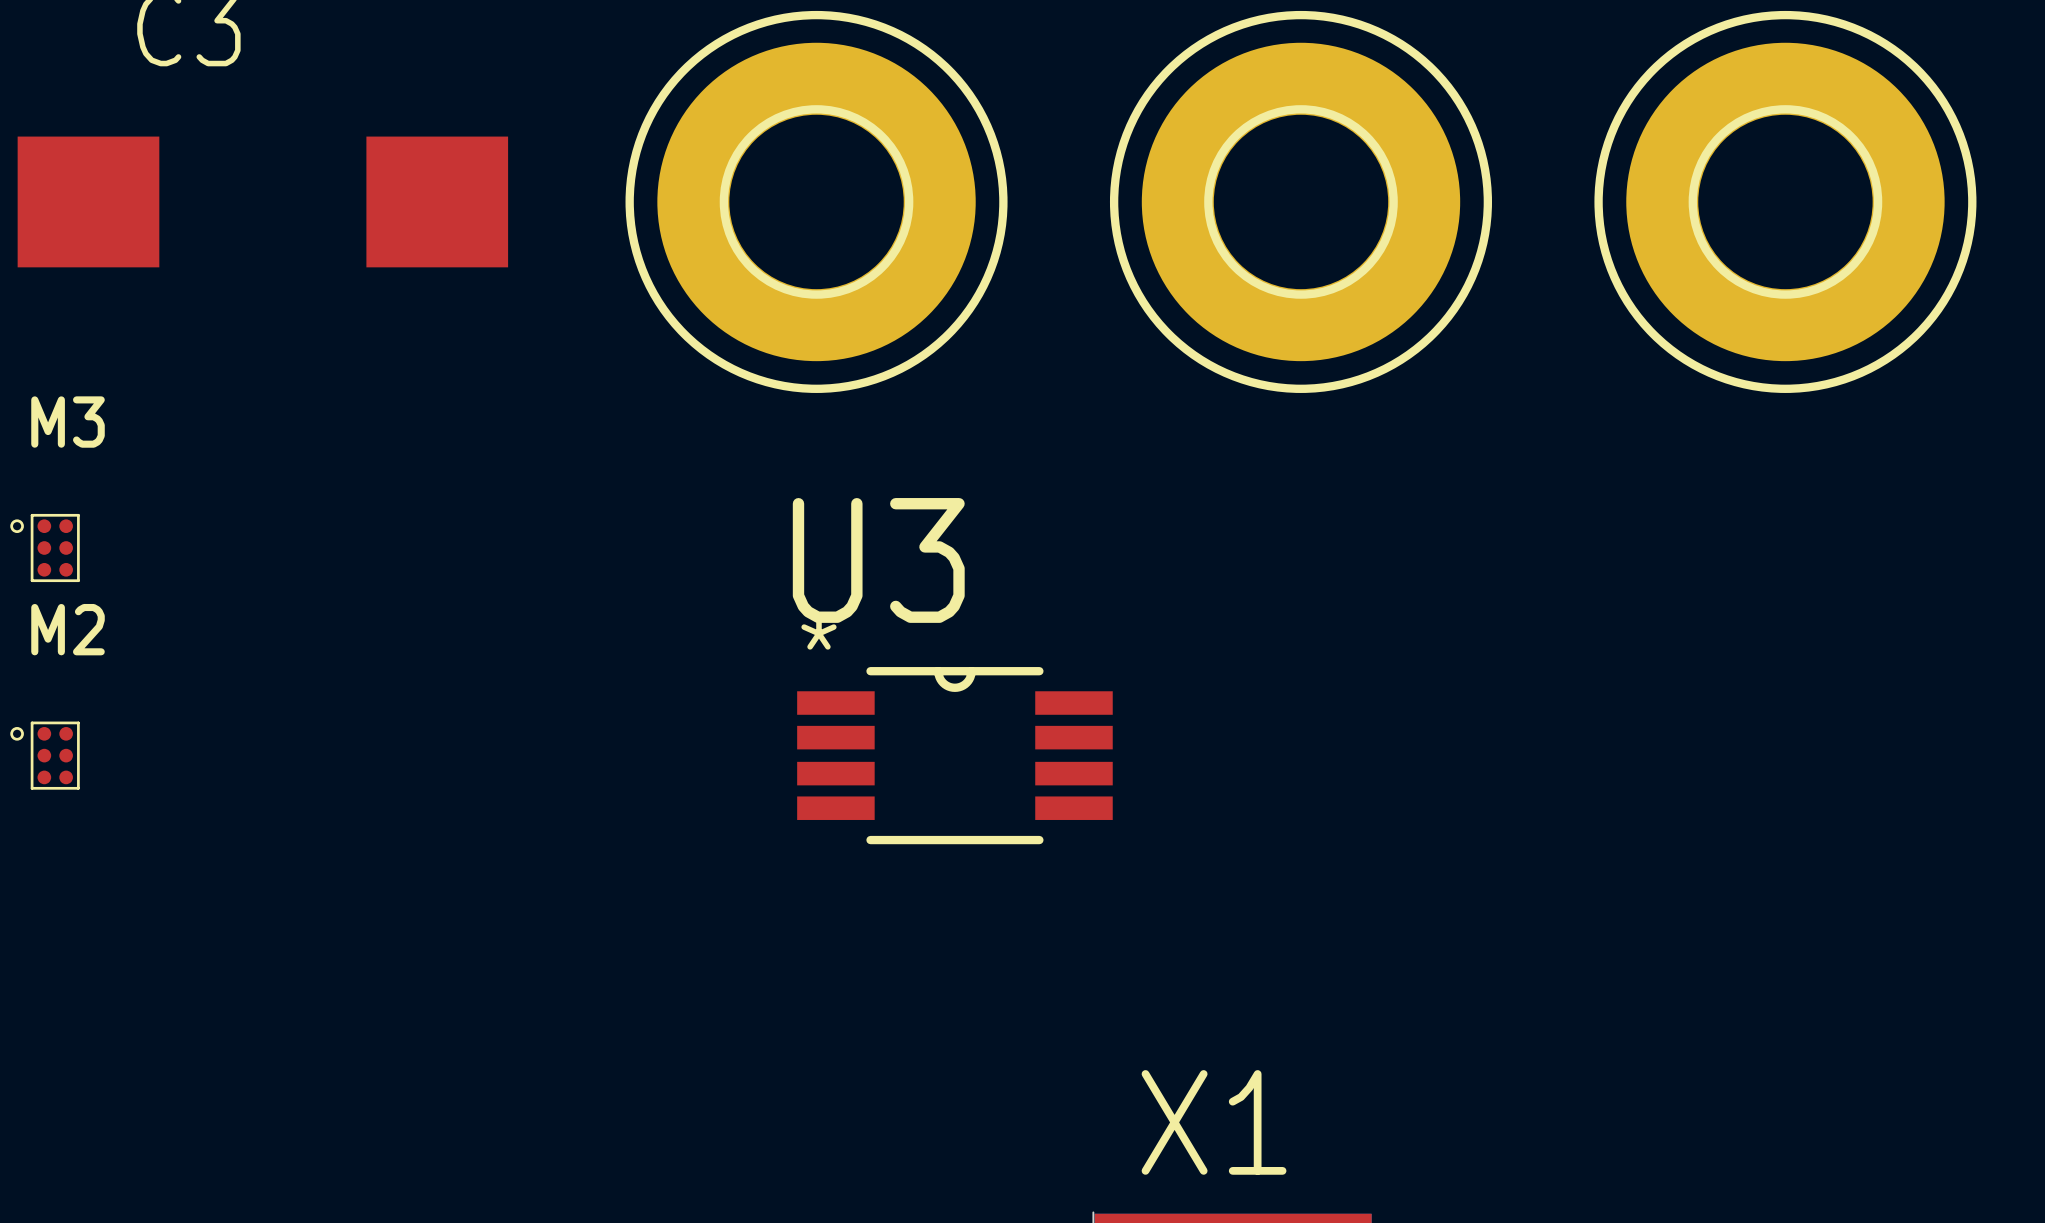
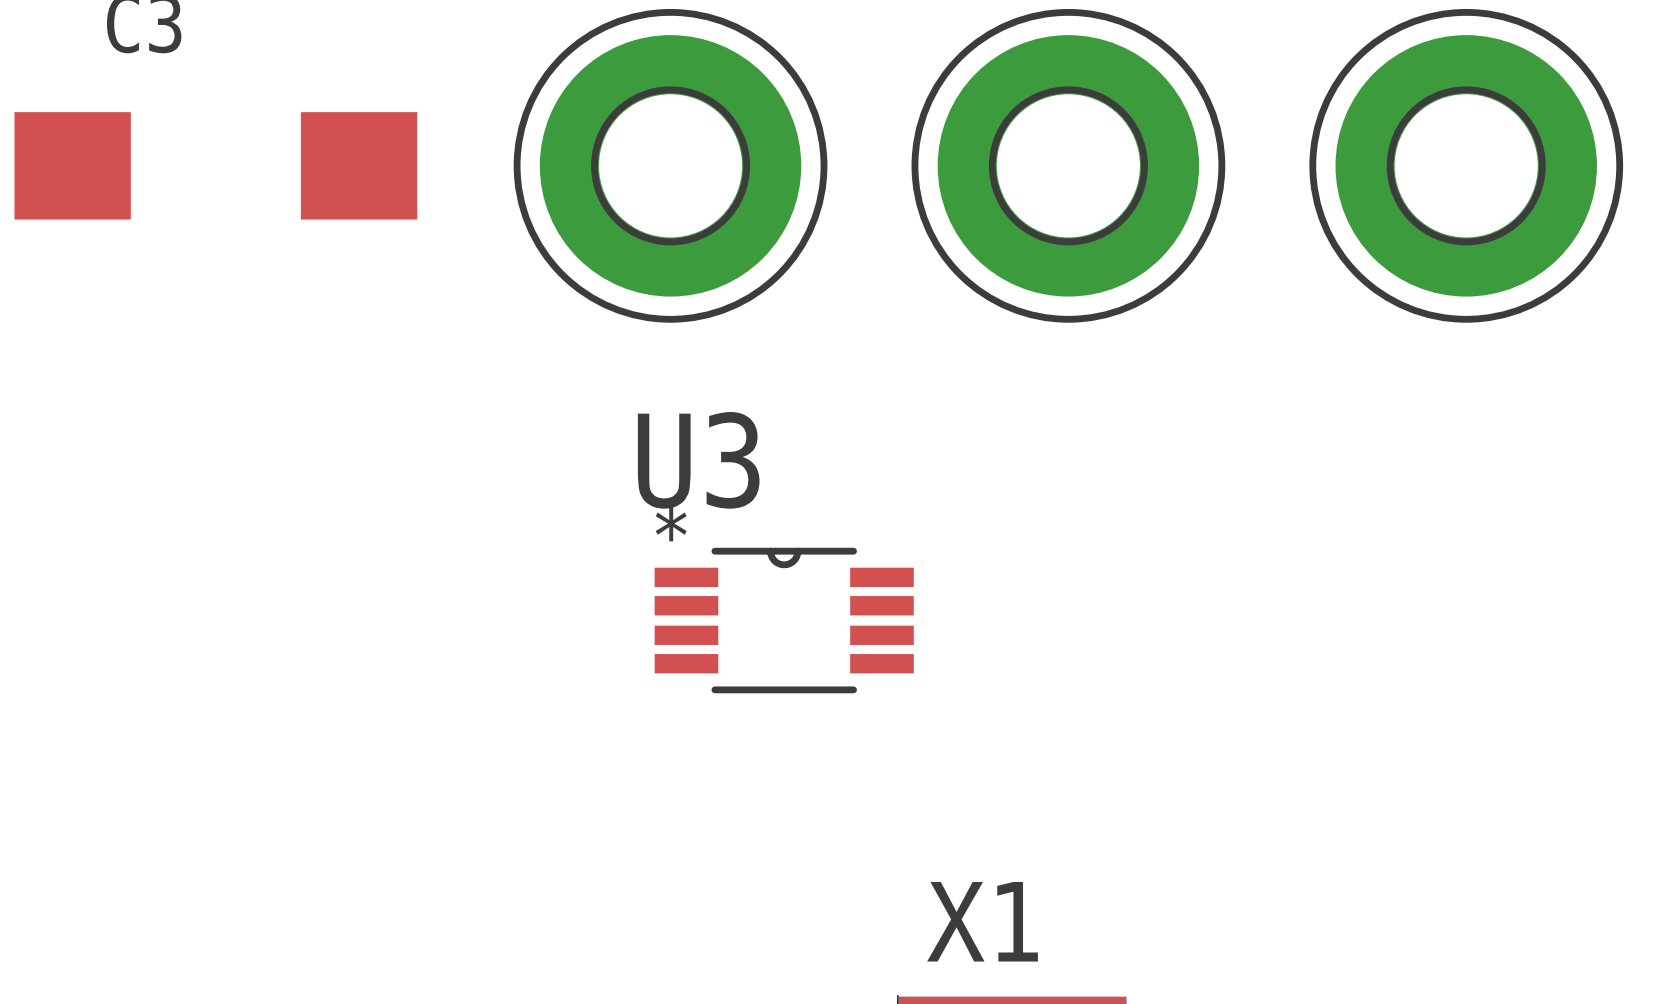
M3: (45, 548) -> none
M2: (45, 755) -> none

